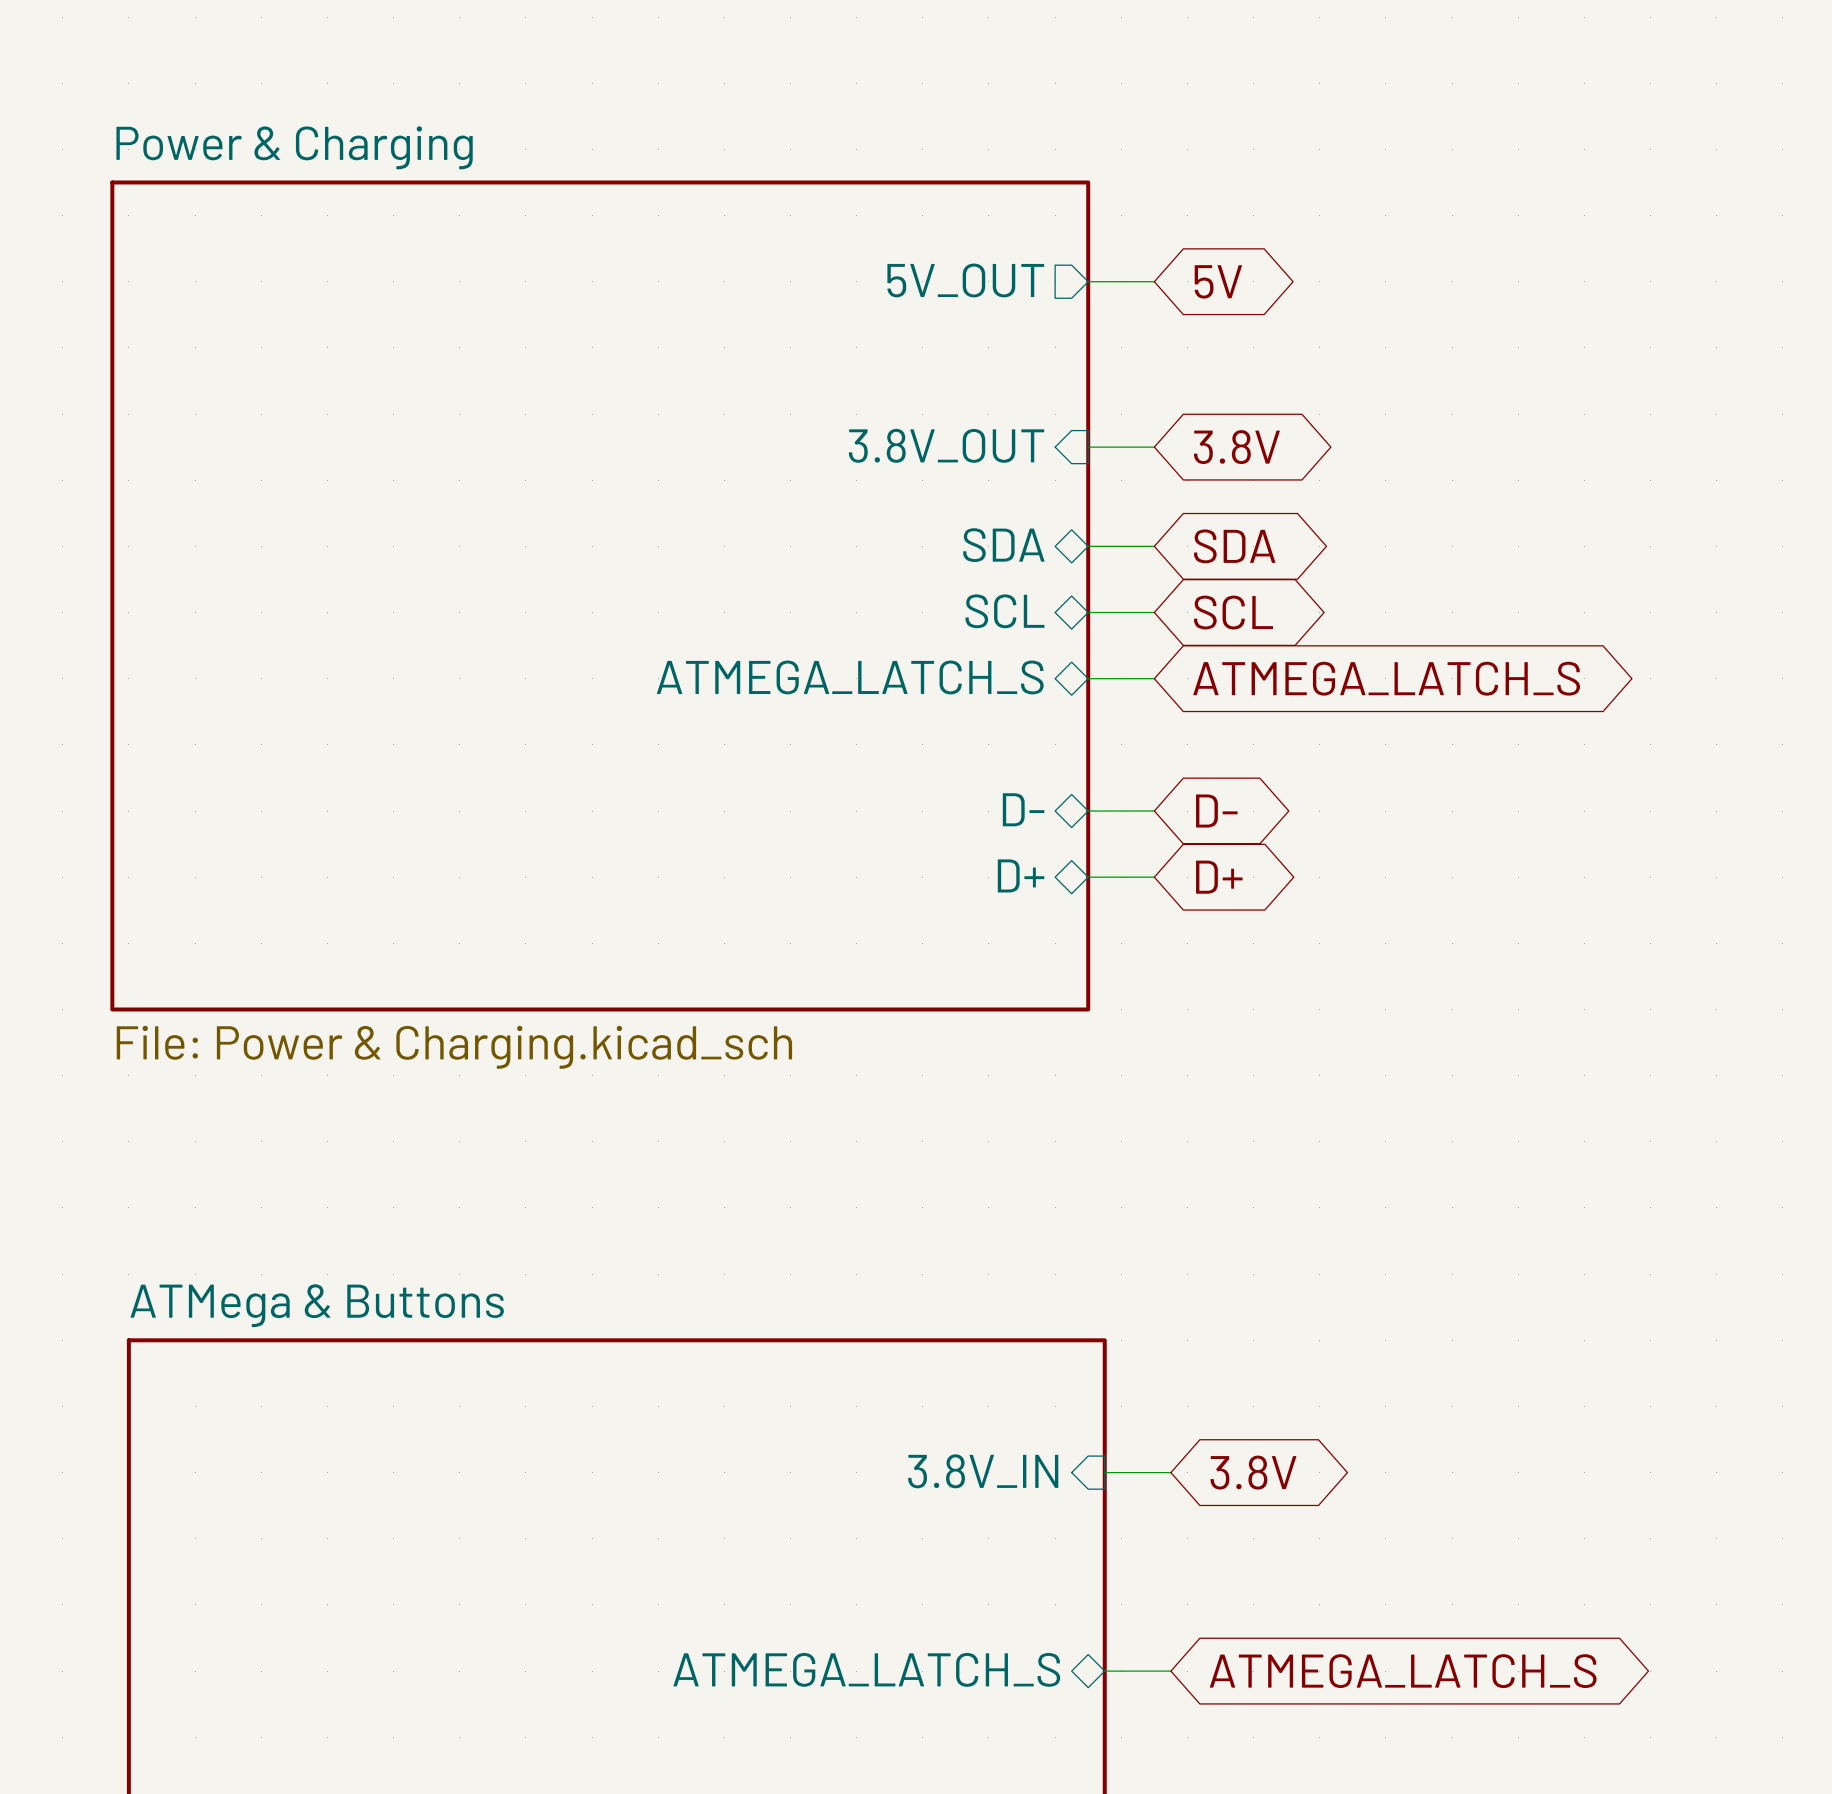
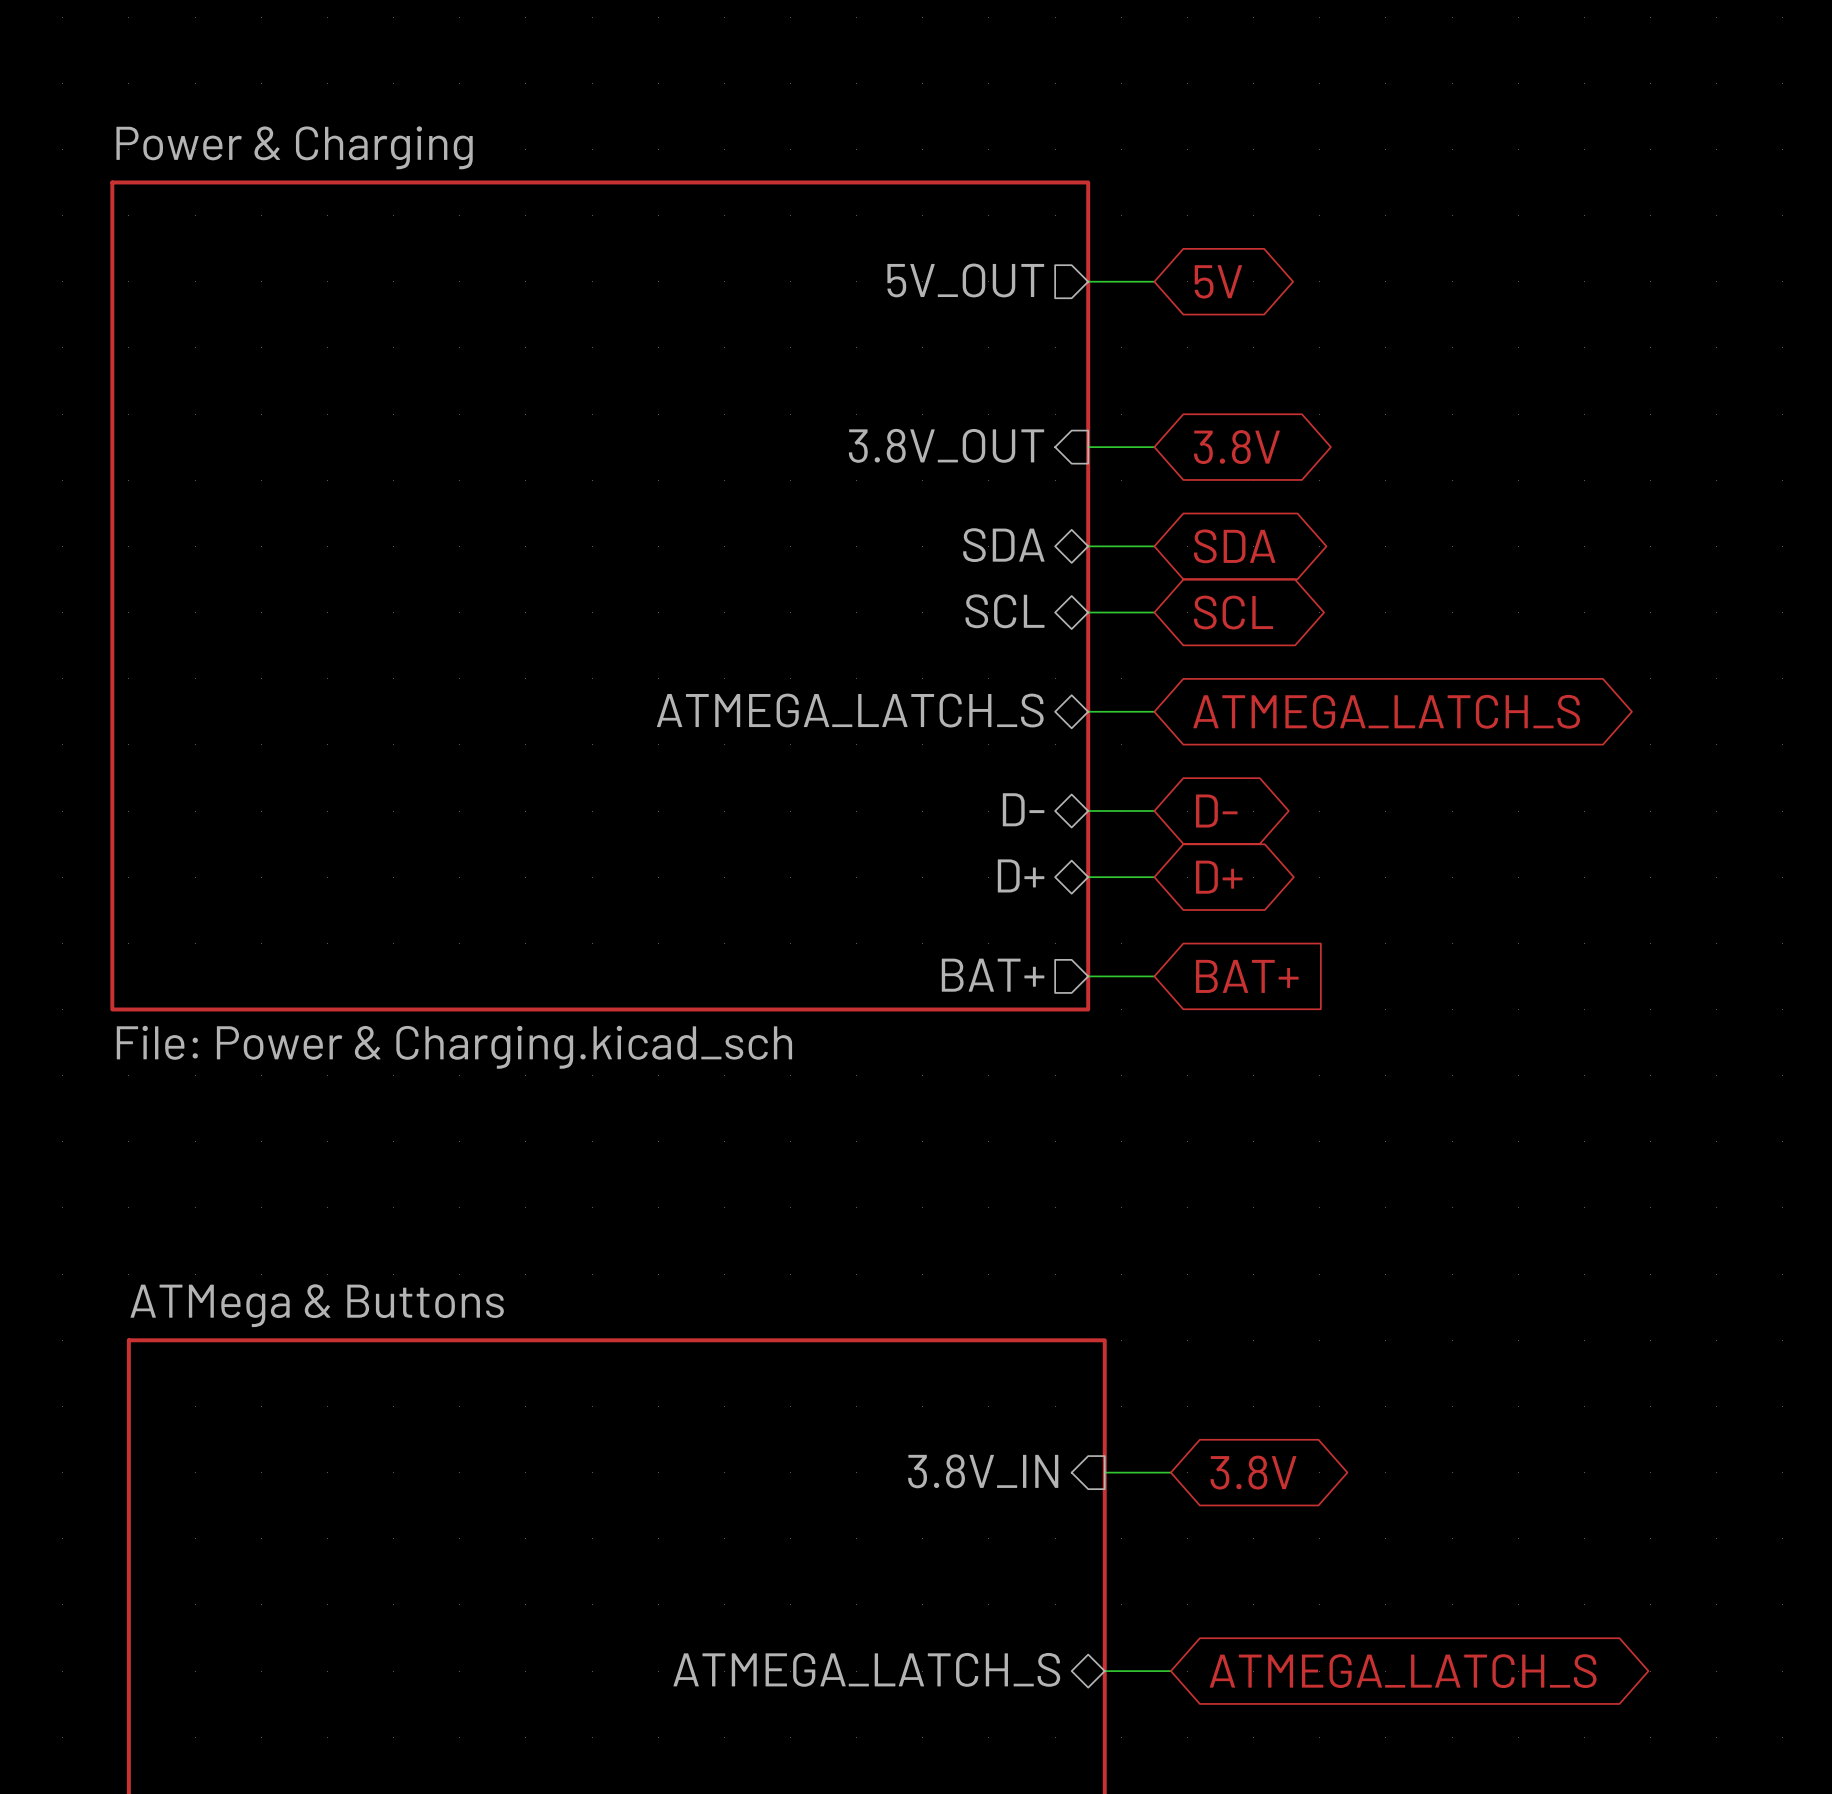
sheet pin position: ATMEGA_LATCH_S (850, 677) -> ATMEGA_LATCH_S (850, 710)
wire: (1088, 678) (1154, 678) -> (1088, 711) (1154, 711)
global label position: ATMEGA_LATCH_S (1386, 678) -> ATMEGA_LATCH_S (1386, 711)
sheet pin: none -> BAT+ (993, 975)
wire: none -> (1088, 976) (1154, 976)
global label: none -> BAT+ (1247, 976)

